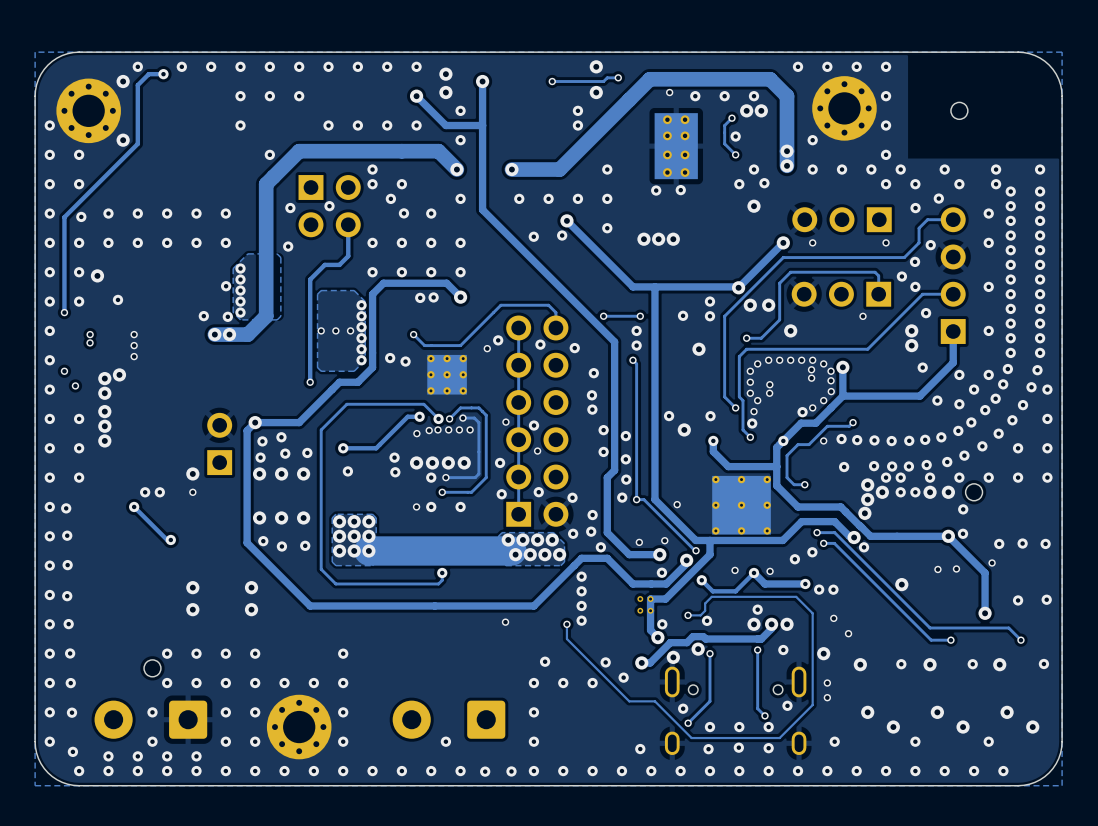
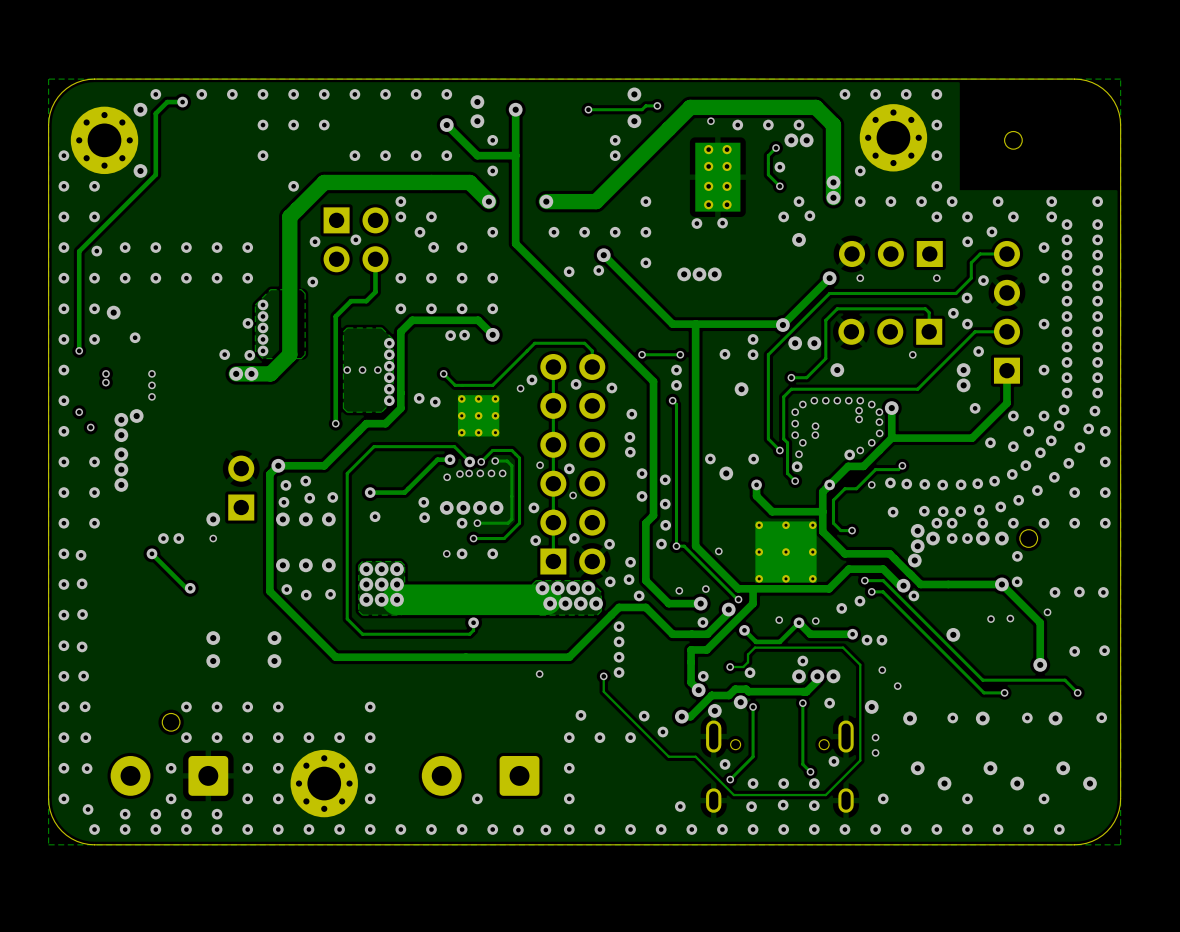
part: (645, 604) -> none

